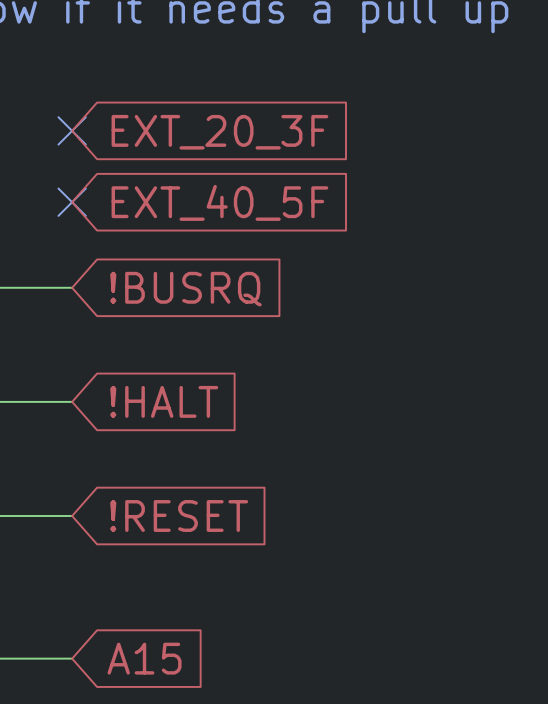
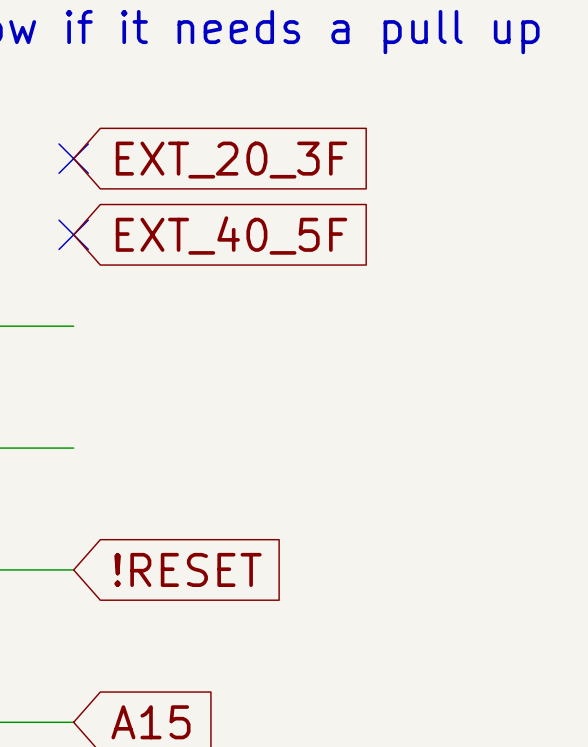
global label: !BUSRQ (185, 289) -> none
global label: !HALT (164, 401) -> none

